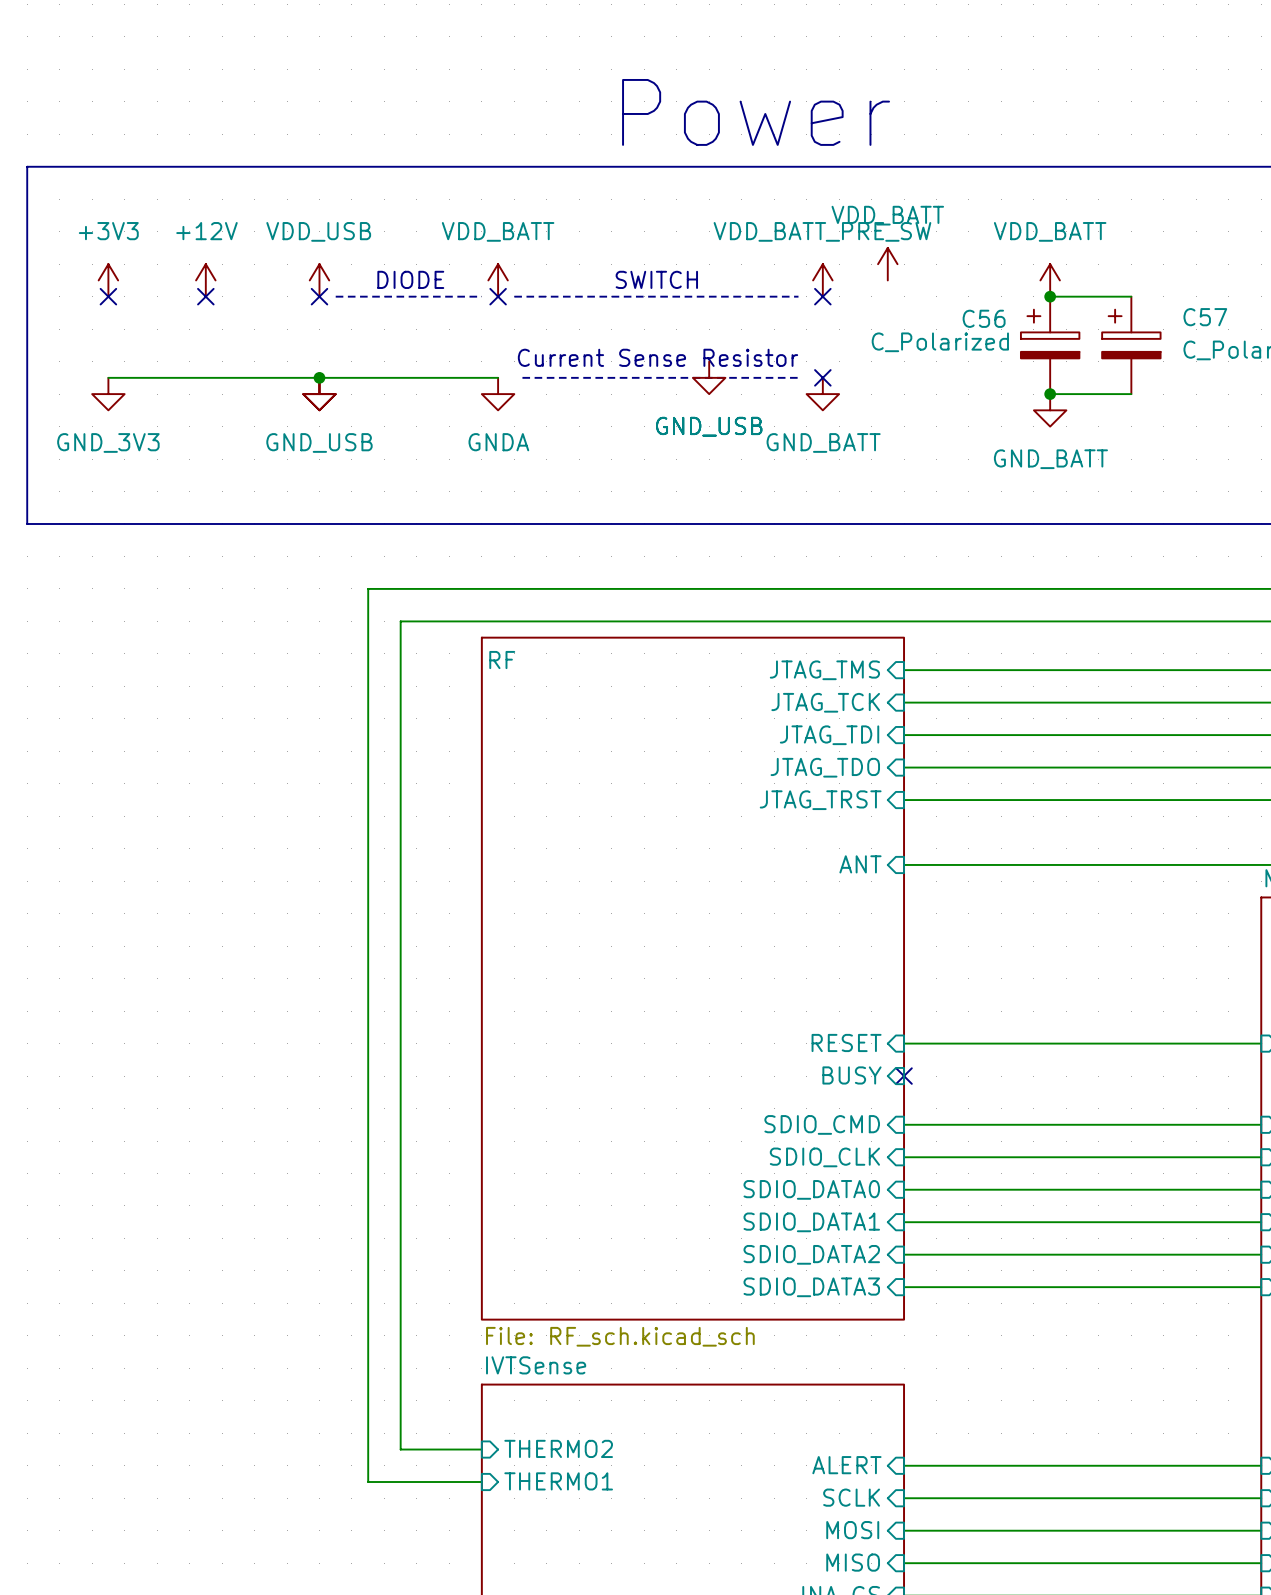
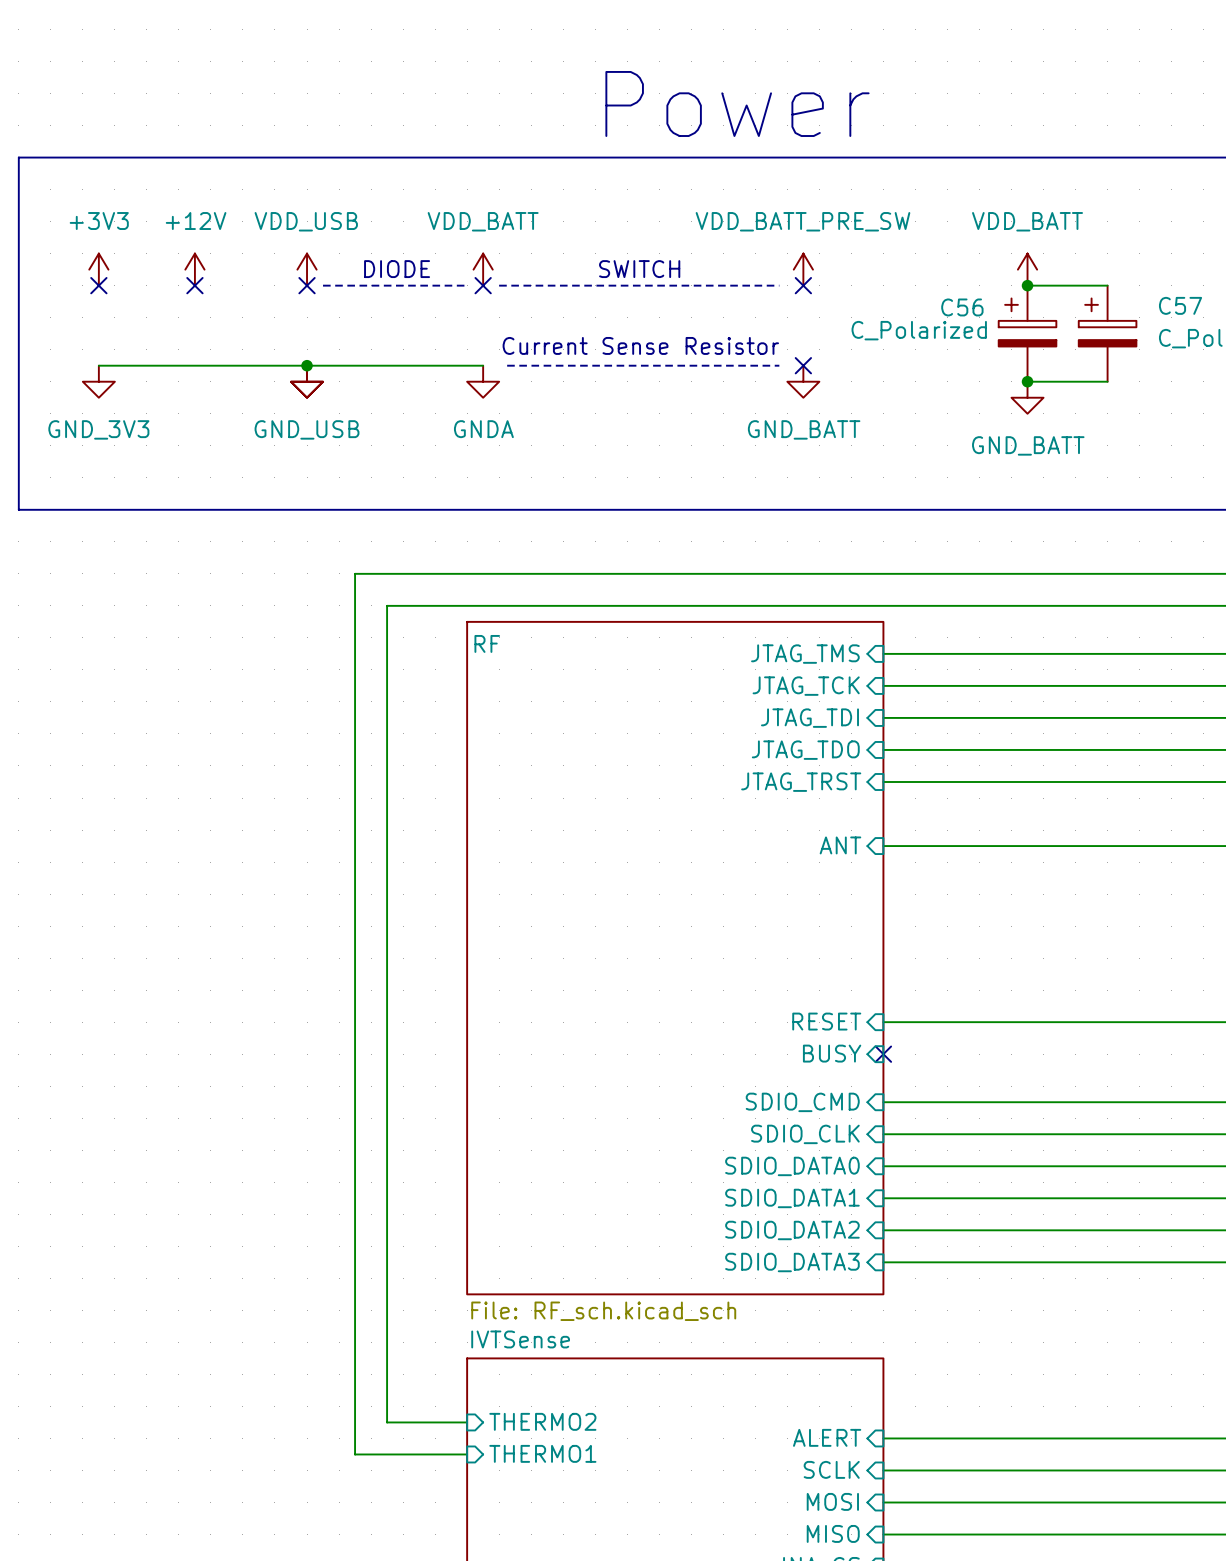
power symbol: VDD_BATT (887, 264) -> none
power symbol: GND_USB (709, 377) -> none
power symbol text: GND_USB (709, 426) -> none

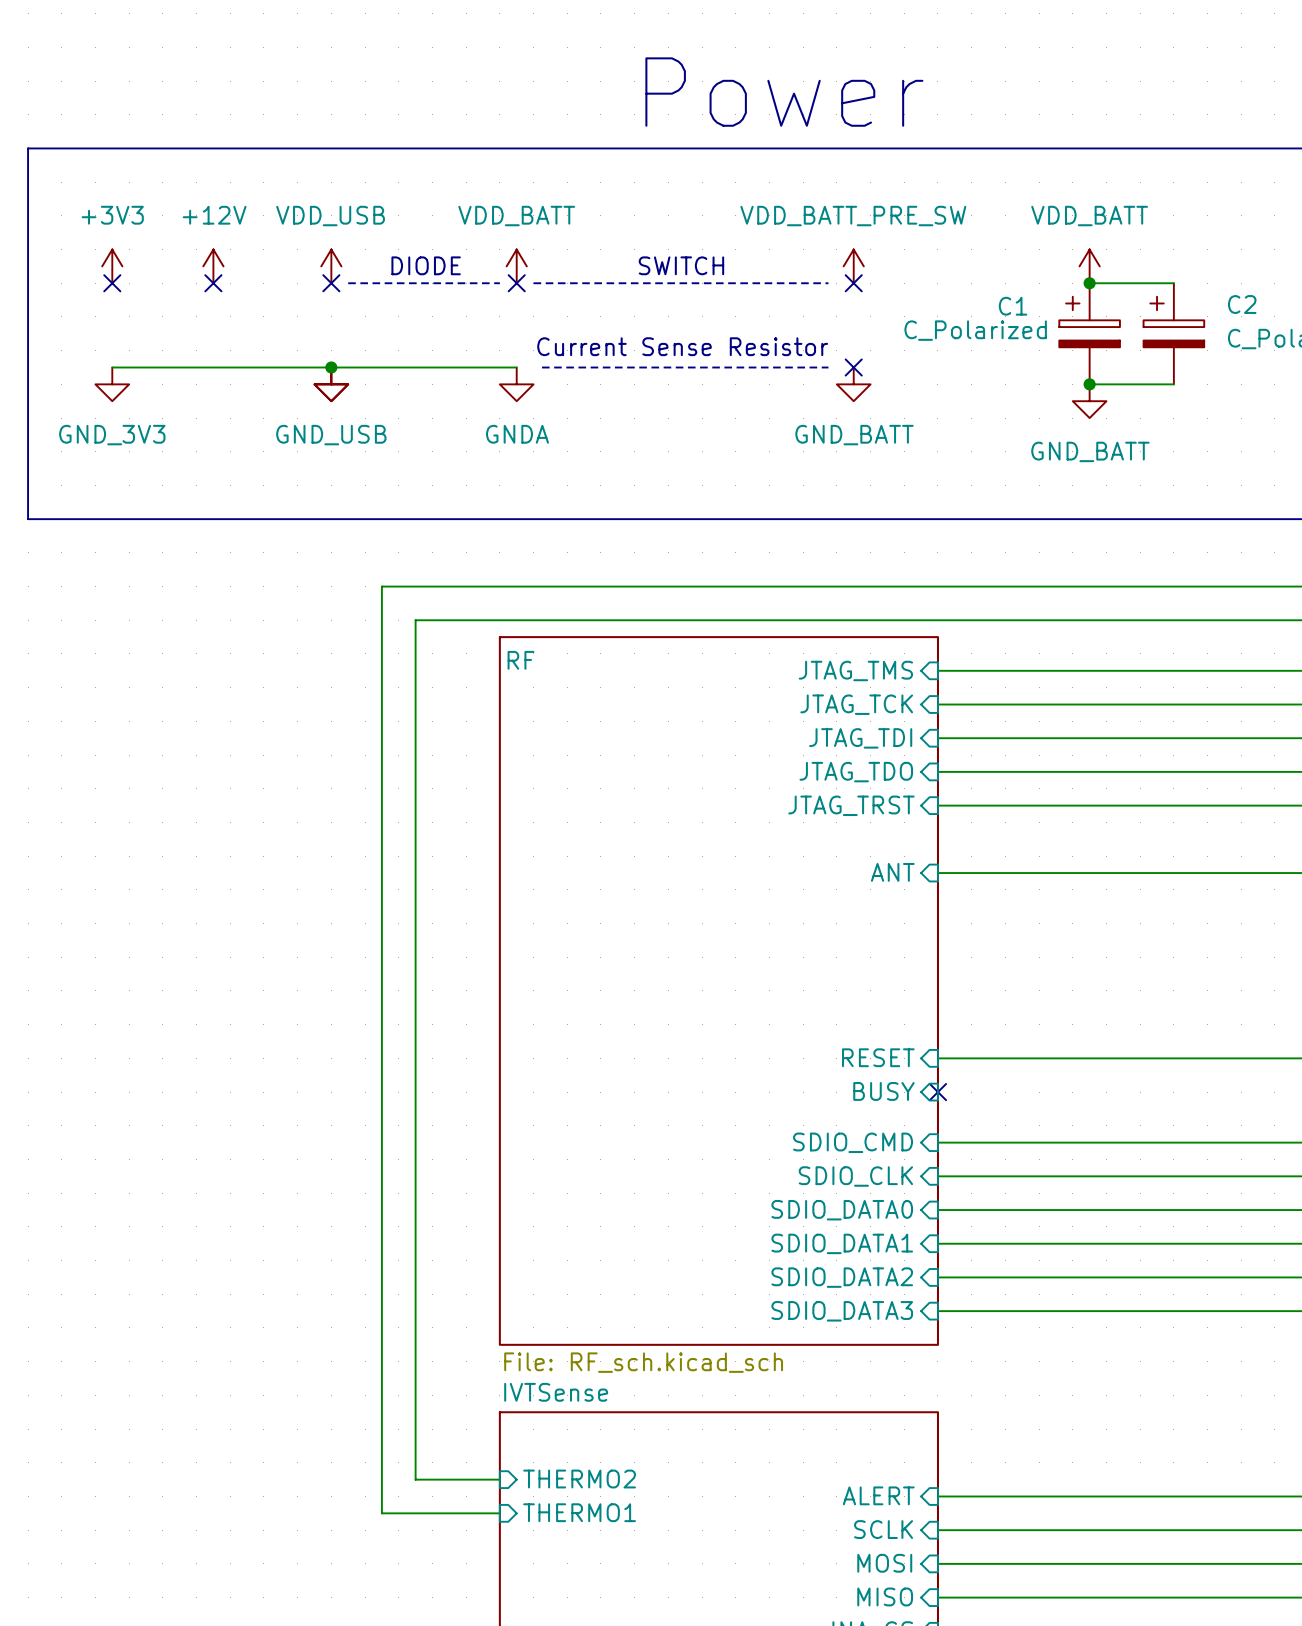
C57 name: C57 (1180, 305) -> C2 (1242, 304)
C56 name: C56 (962, 307) -> C1 (1013, 306)

